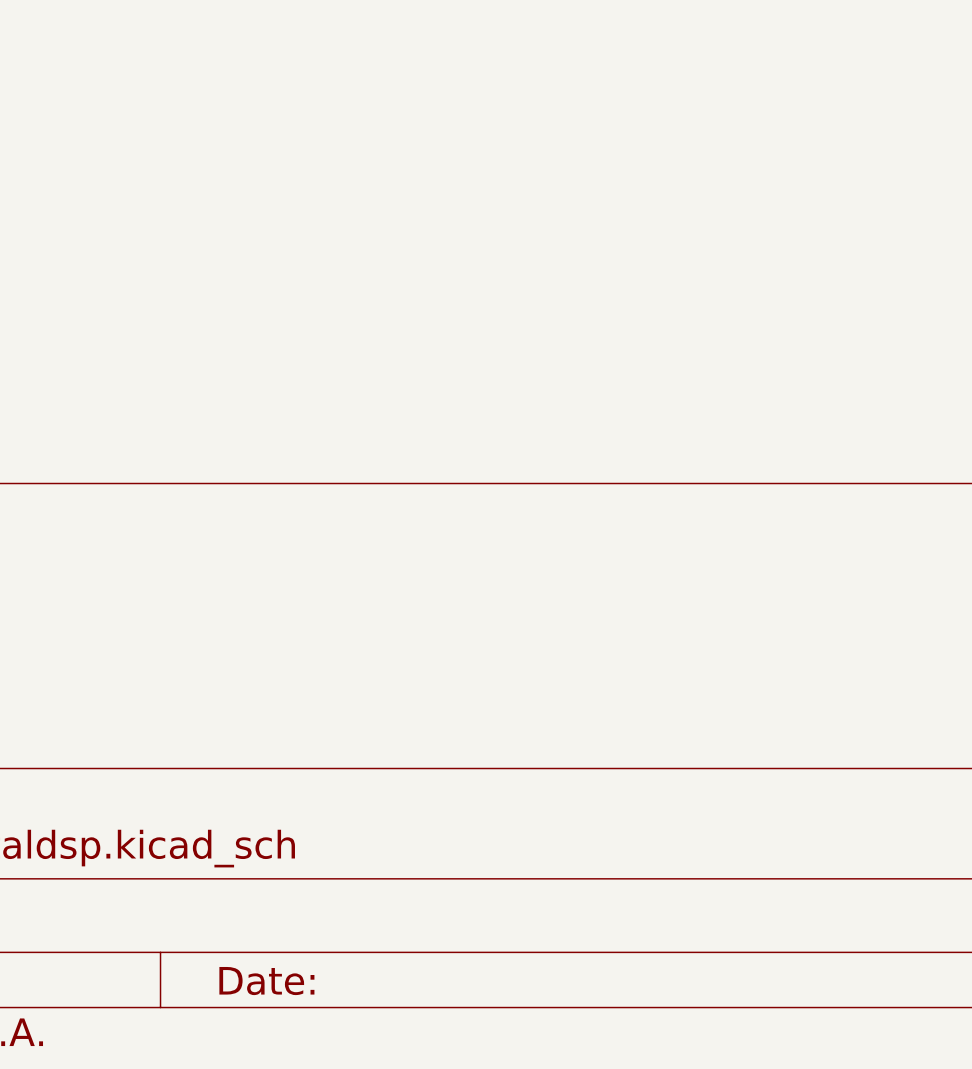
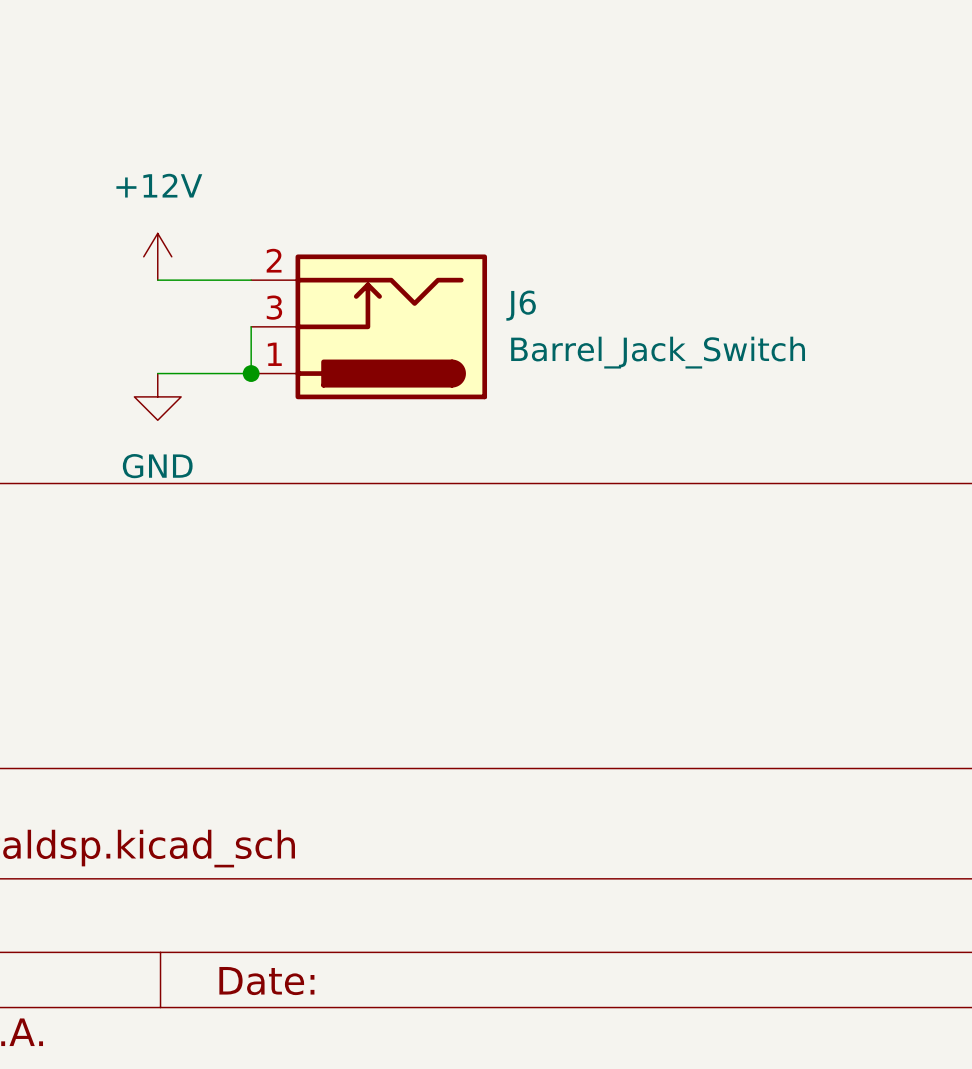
power symbol: none -> +12V (157, 256)
wire: none -> (157, 280) (251, 280)
wire: none -> (251, 326) (251, 373) (157, 373)
J6: none -> Barrel_Jack_Switch (369, 326)
junction: none -> (251, 373)
power symbol: none -> GND (157, 396)

